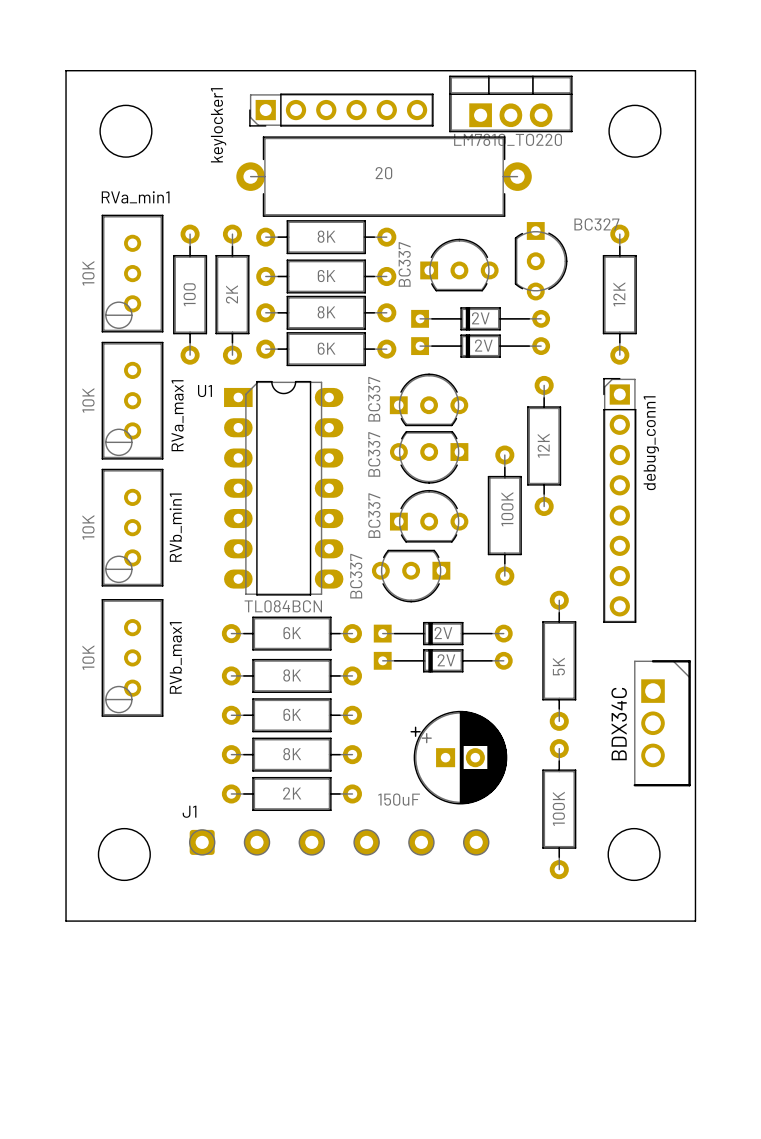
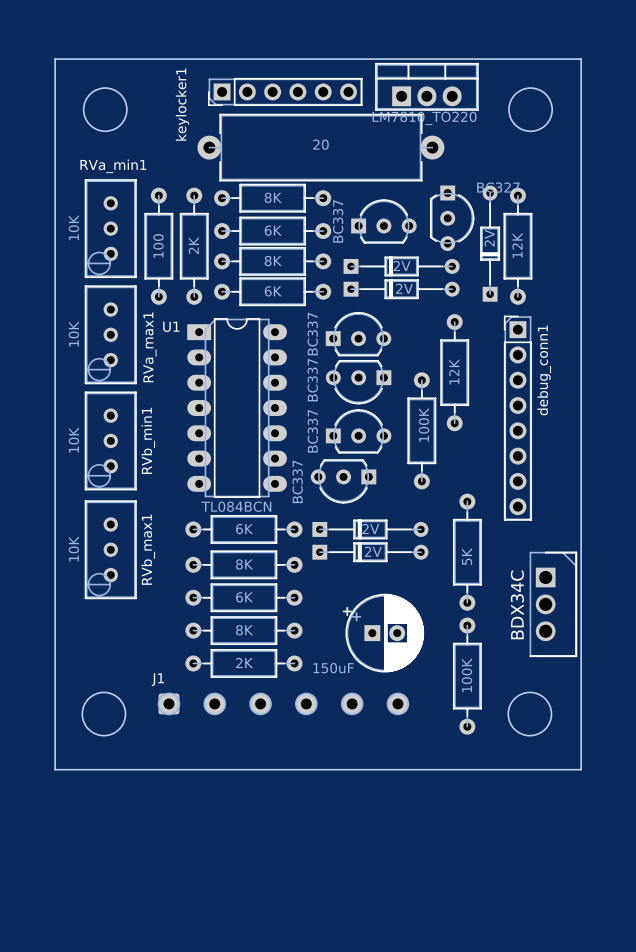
part: none -> 2V (490, 243)

